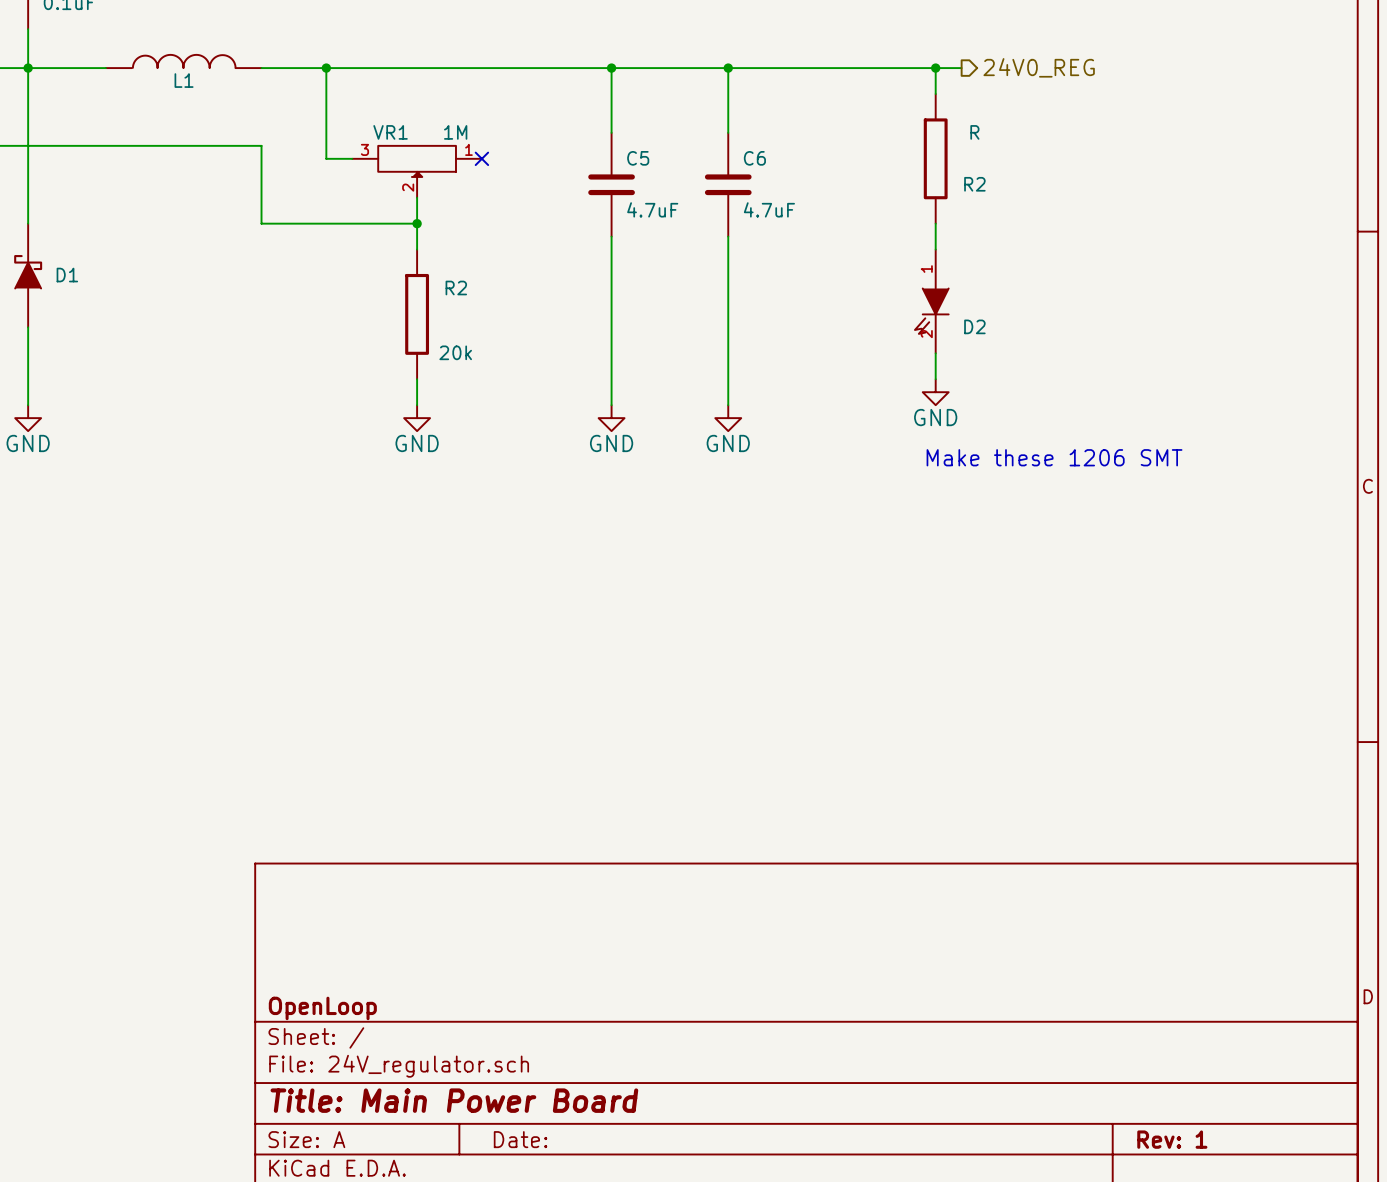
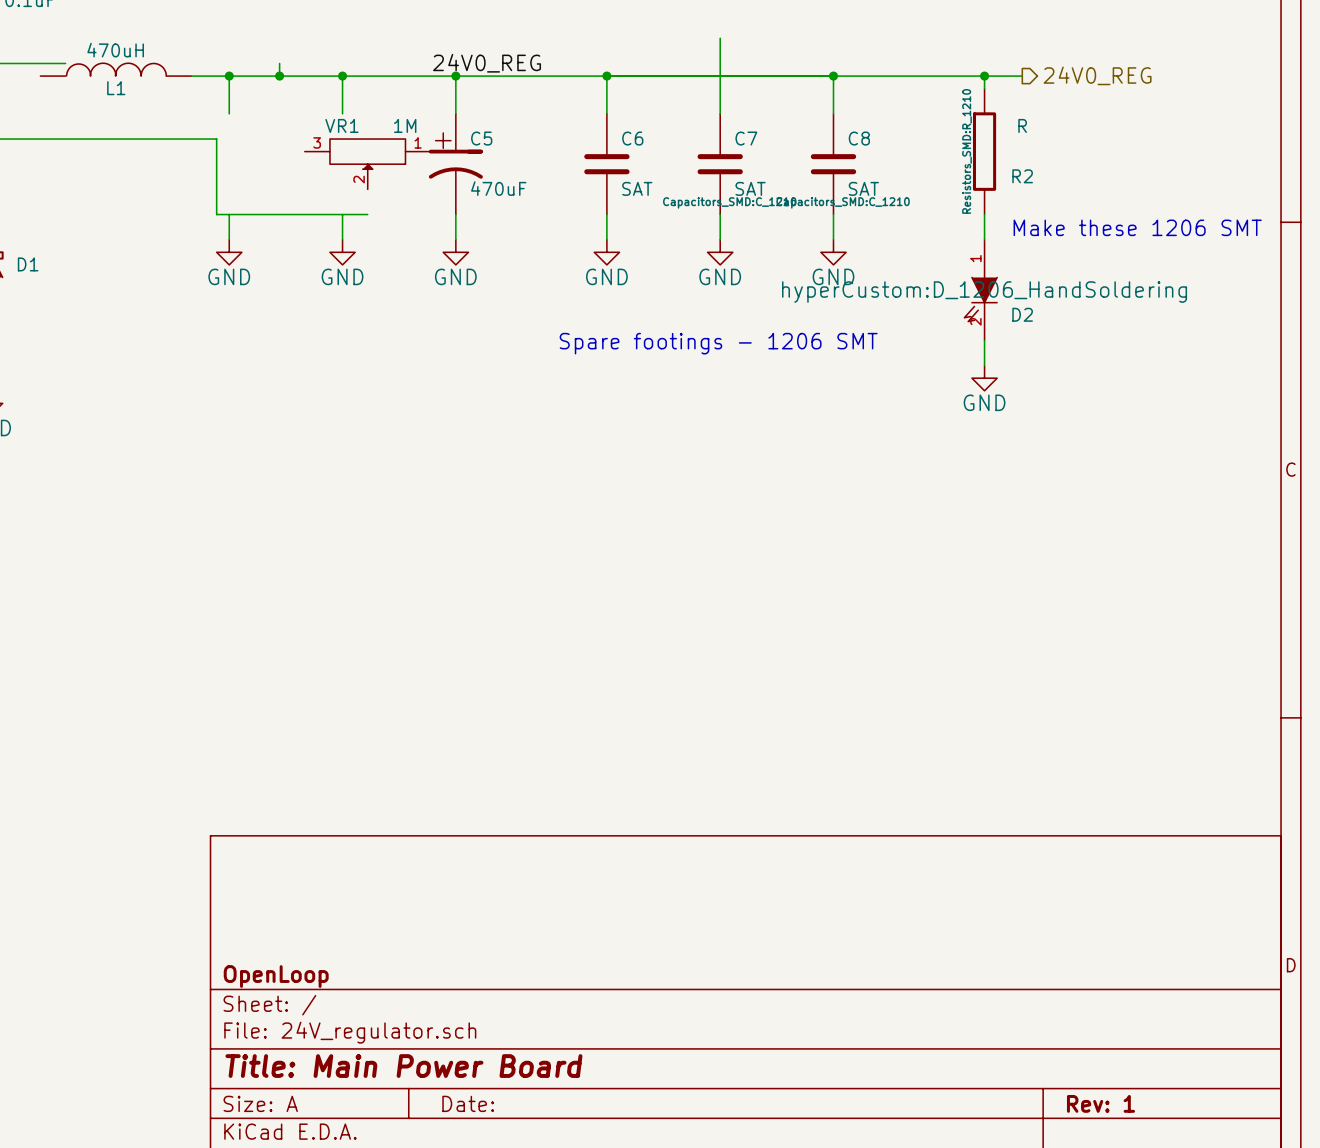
wire: none -> (720, 38) (720, 113)
L1 value: none -> 470uH (115, 50)
L1 position: (183, 61) -> (115, 69)
label: none -> 24V0_REG (487, 63)
hierarchical label position: 24V0_REG (1039, 67) -> 24V0_REG (1097, 75)
wire: (261, 68) (961, 68) -> none
junction position: (326, 68) -> (279, 76)
wire: (611, 68) (611, 132) -> none
junction: (611, 68) -> none
wire: (728, 68) (728, 132) -> none
junction: (728, 68) -> none
wire: (935, 68) (935, 94) -> (833, 214) (833, 239)
junction position: (935, 68) -> (833, 76)
wire: none -> (191, 76) (1022, 76)
wire: none -> (229, 76) (229, 113)
junction: none -> (229, 76)
wire: (326, 81) (326, 158) (352, 158) -> none
wire: none -> (342, 76) (342, 113)
junction: none -> (342, 76)
wire: none -> (455, 76) (455, 113)
junction: none -> (455, 76)
wire: none -> (606, 76) (606, 113)
junction: none -> (606, 76)
wire: none -> (833, 76) (833, 113)
wire: none -> (984, 76) (984, 88)
junction: none -> (984, 76)
C5 symbol: [588, 132, 635, 237] -> [428, 113, 483, 215]
no-connect mark: (481, 158) -> none
R2: R (935, 158) -> none
R2: none -> R (984, 151)
C7: none -> SAT (720, 164)
C8: none -> SAT (833, 164)
C6 position: (728, 184) -> (606, 164)
wire: (417, 197) (417, 249) -> none
C5 value: 4.7uF (652, 209) -> 470uF (498, 188)
C6 value: 4.7uF (769, 209) -> SAT (637, 188)
wire: none -> (229, 214) (229, 239)
junction: (417, 223) -> none
wire: none -> (455, 214) (455, 239)
wire: none -> (606, 214) (606, 239)
wire: none -> (720, 214) (720, 239)
wire: (935, 223) (935, 249) -> (984, 214) (984, 239)
wire: (611, 236) (611, 405) -> none
wire: (728, 236) (728, 405) -> none
text: none -> Make these 1206 SMT (1137, 227)
power symbol: none -> GND (229, 252)
power symbol: none -> GND (342, 252)
power symbol: none -> GND (455, 252)
power symbol: none -> GND (606, 252)
power symbol: none -> GND (720, 252)
power symbol: none -> GND (833, 252)
D2 position: (931, 301) -> (980, 290)
D2 text: none -> hyperCustom:D_1206_HandSoldering (984, 292)
R2: 20k (417, 314) -> none
wire: (935, 353) (935, 379) -> (984, 340) (984, 365)
text: none -> Spare footings - 1206 SMT (718, 343)
wire: (417, 379) (417, 405) -> (342, 214) (342, 239)
power symbol: GND (935, 392) -> none
power symbol: none -> GND (984, 378)
power symbol: GND (417, 418) -> none
power symbol: GND (611, 418) -> none
power symbol: GND (728, 418) -> none
text: Make these 1206 SMT (1054, 457) -> none

